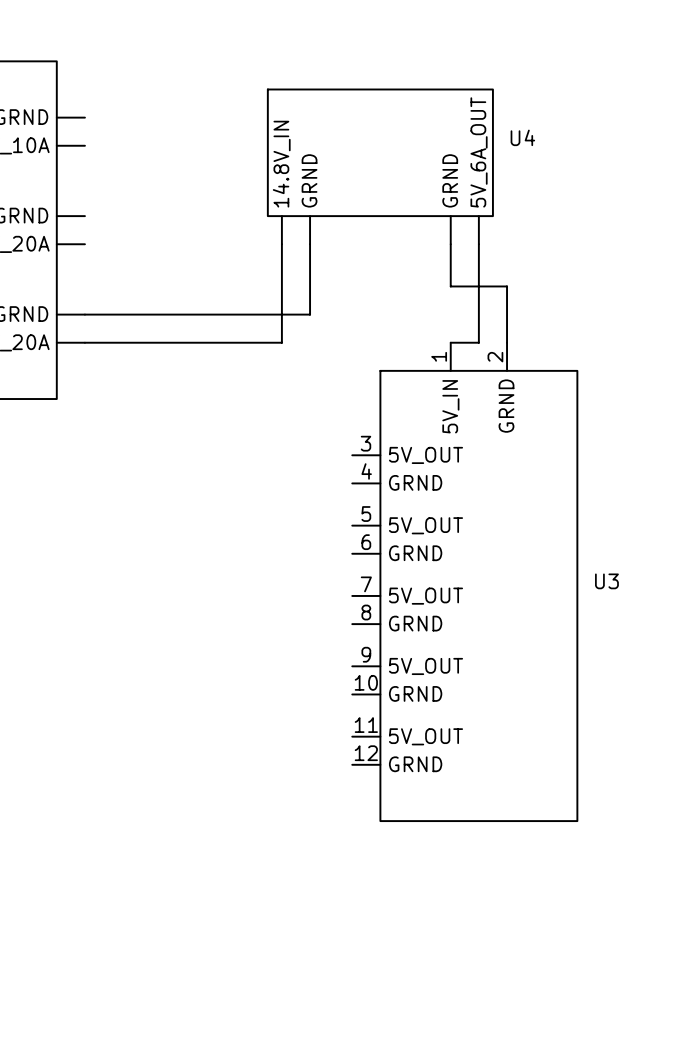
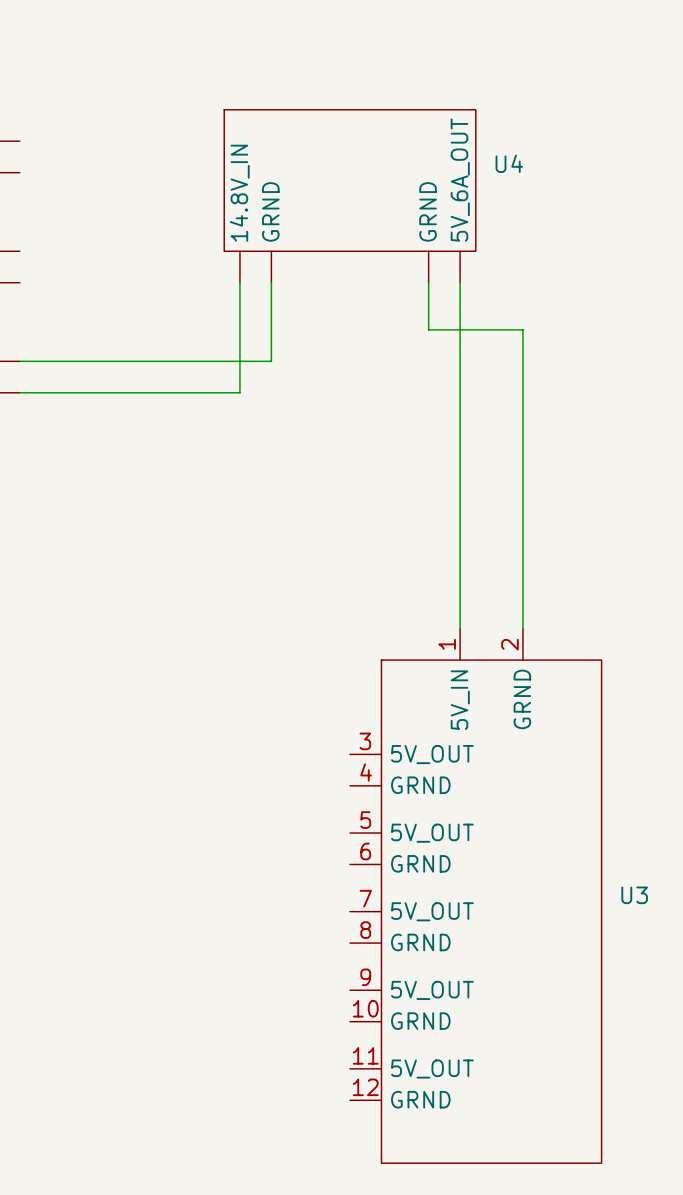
wire: (507, 286) (507, 342) -> (491, 329) (522, 329) (522, 628)
wire: (450, 342) (478, 342) -> (460, 628) (460, 392)
U3 position: (464, 581) -> (475, 895)

